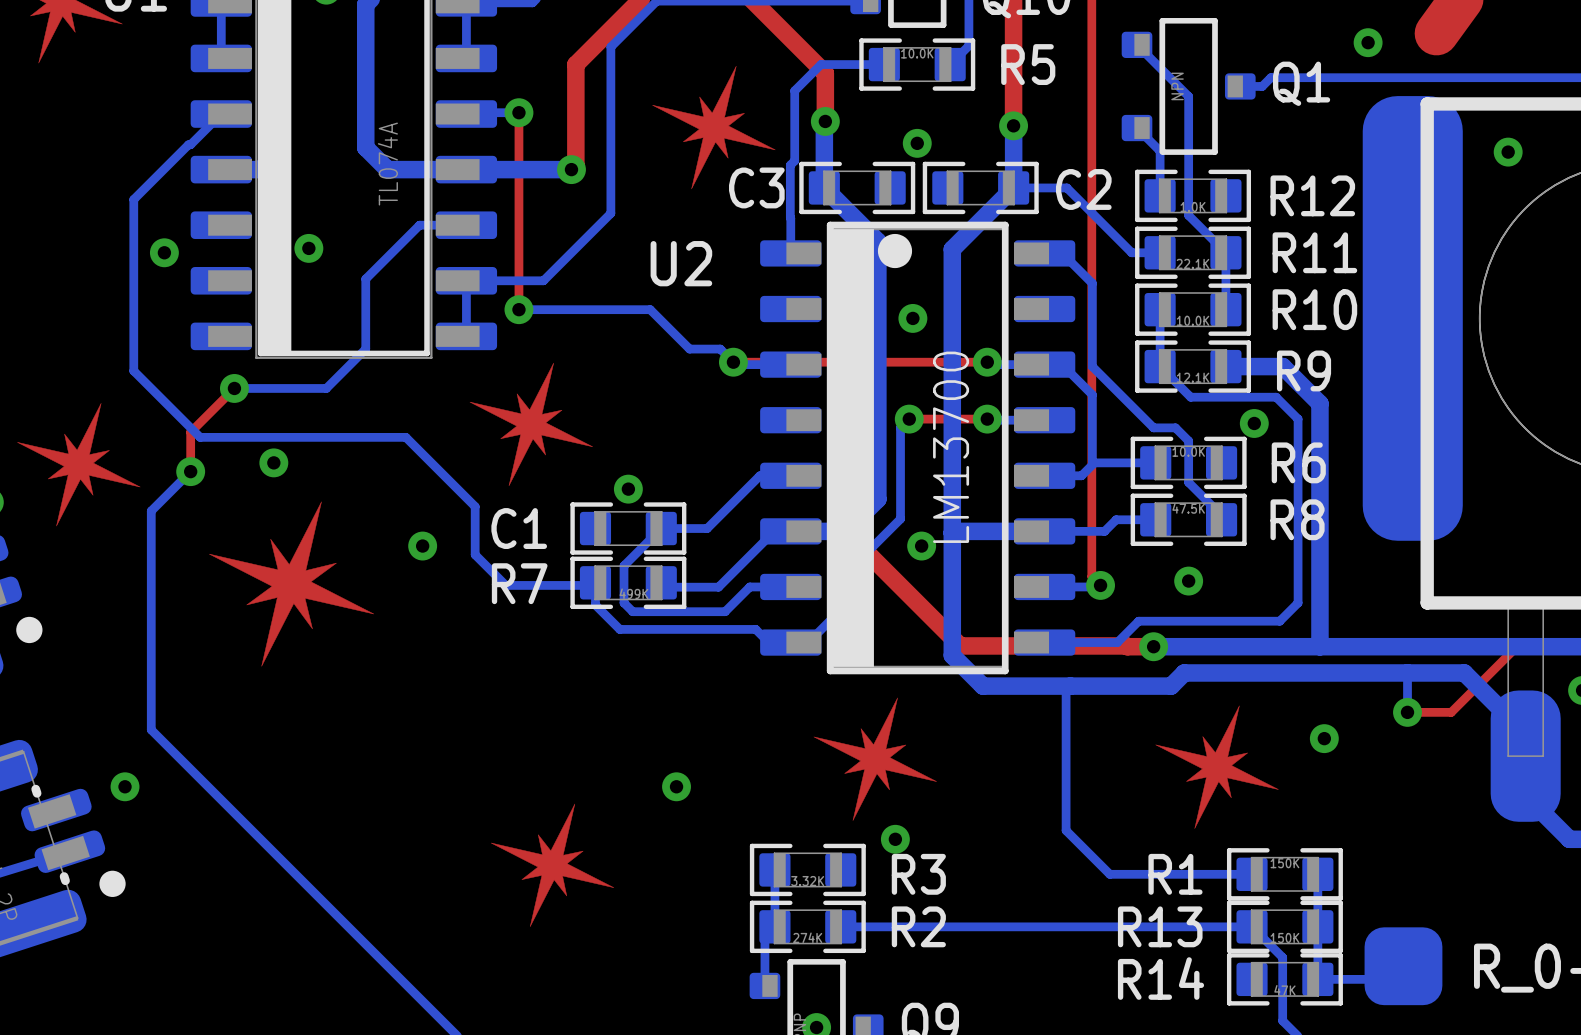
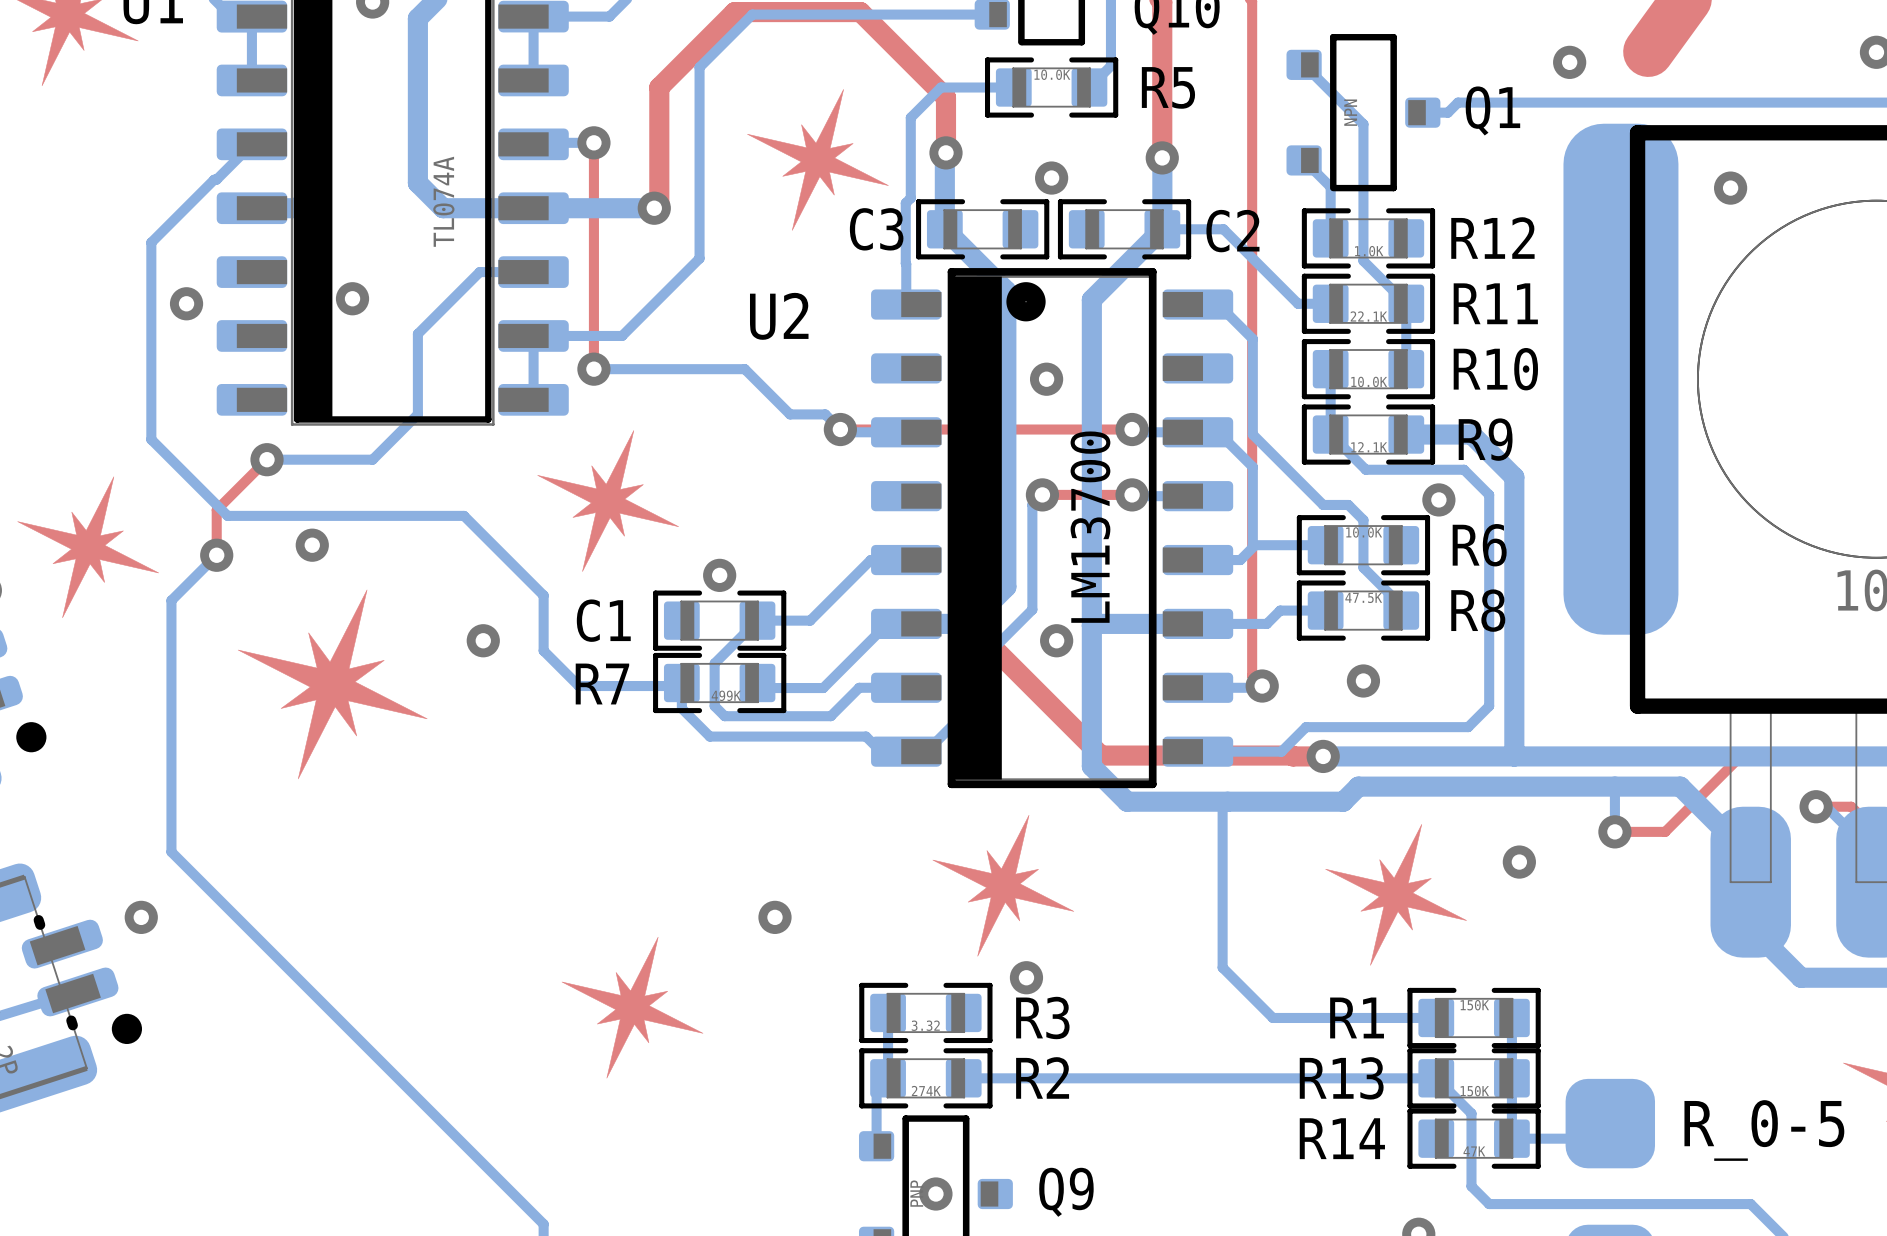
R3 value: 3.32K (807, 881) -> 3.32 (925, 1025)

